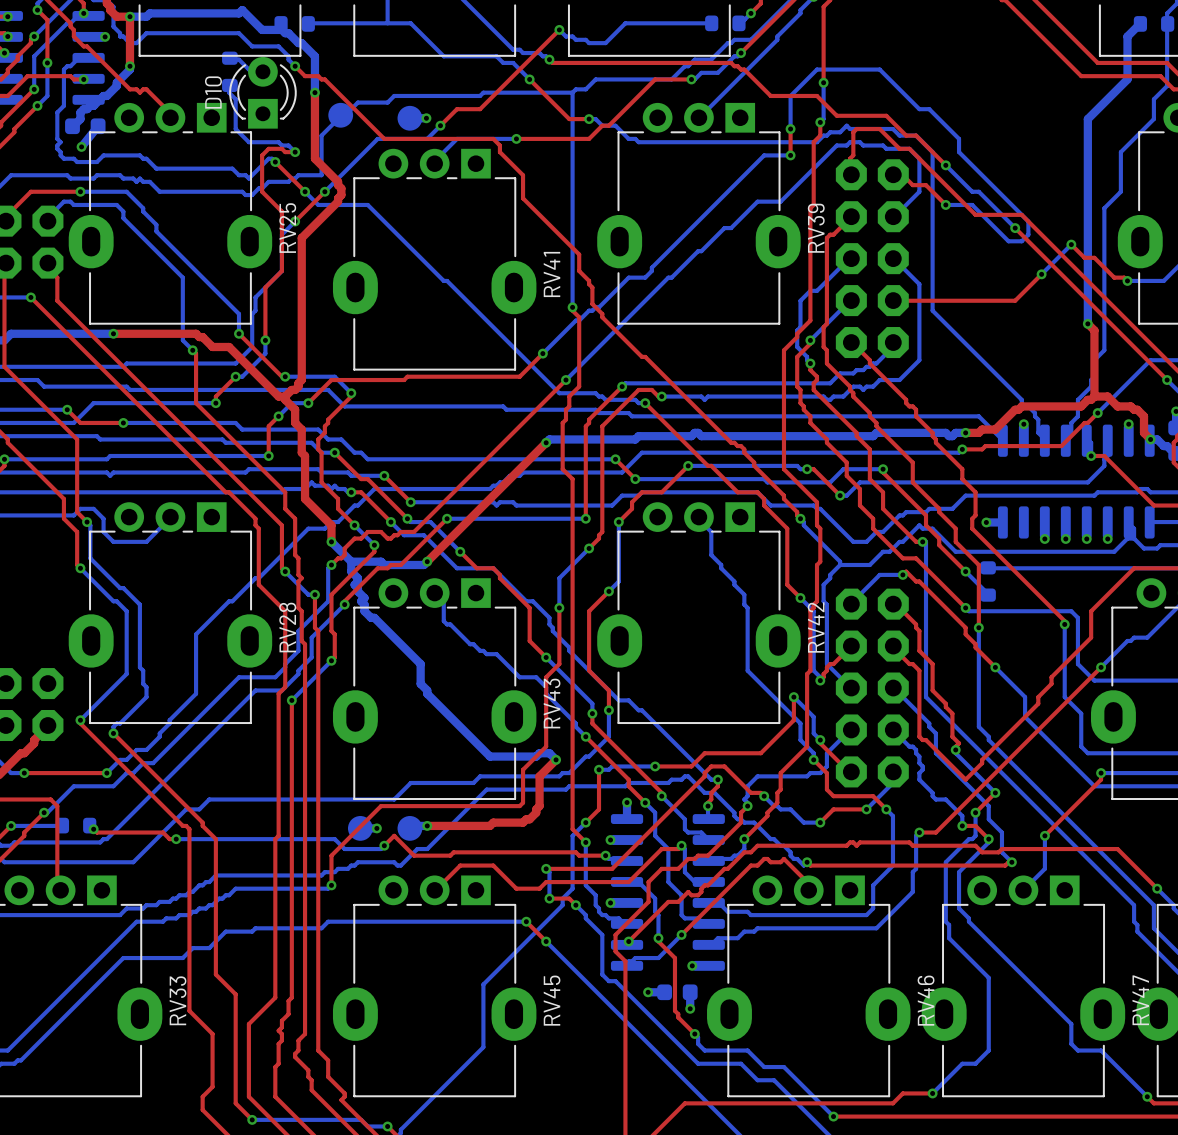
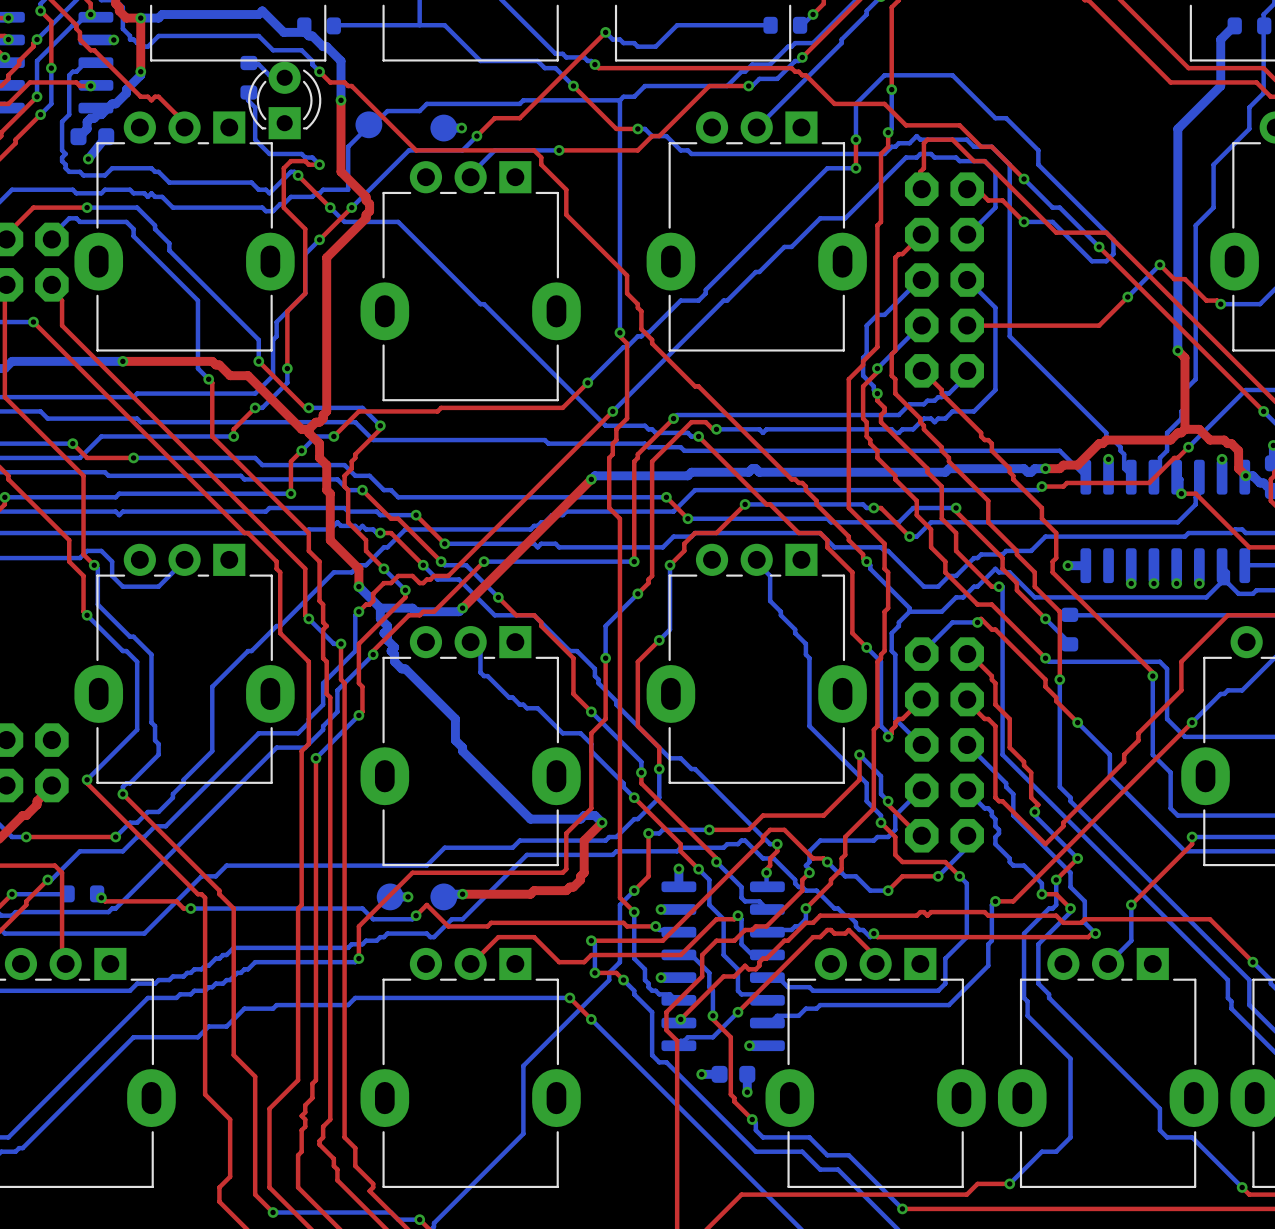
D10 name: D10 (213, 92) -> none
RV25 name: RV25 (287, 228) -> none
RV39 name: RV39 (816, 228) -> none
RV41 name: RV41 (551, 274) -> none
RV28 name: RV28 (287, 627) -> none
RV42 name: RV42 (816, 627) -> none
RV43 name: RV43 (552, 703) -> none
RV33 name: RV33 (178, 1000) -> none
RV45 name: RV45 (552, 1000) -> none
RV46 name: RV46 (926, 1000) -> none
RV47 name: RV47 (1140, 1000) -> none

